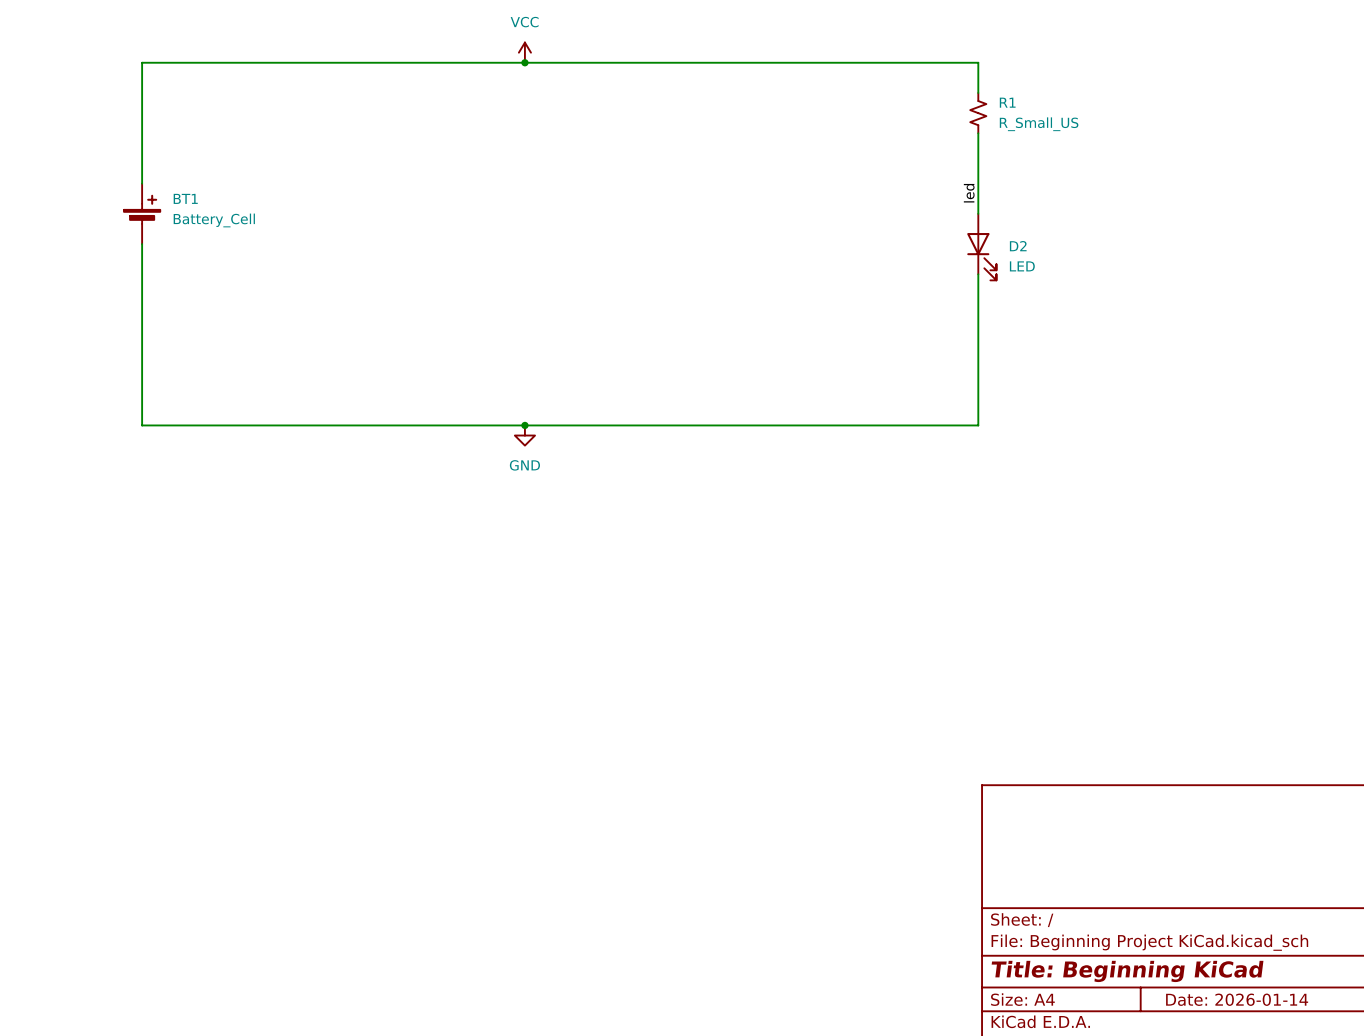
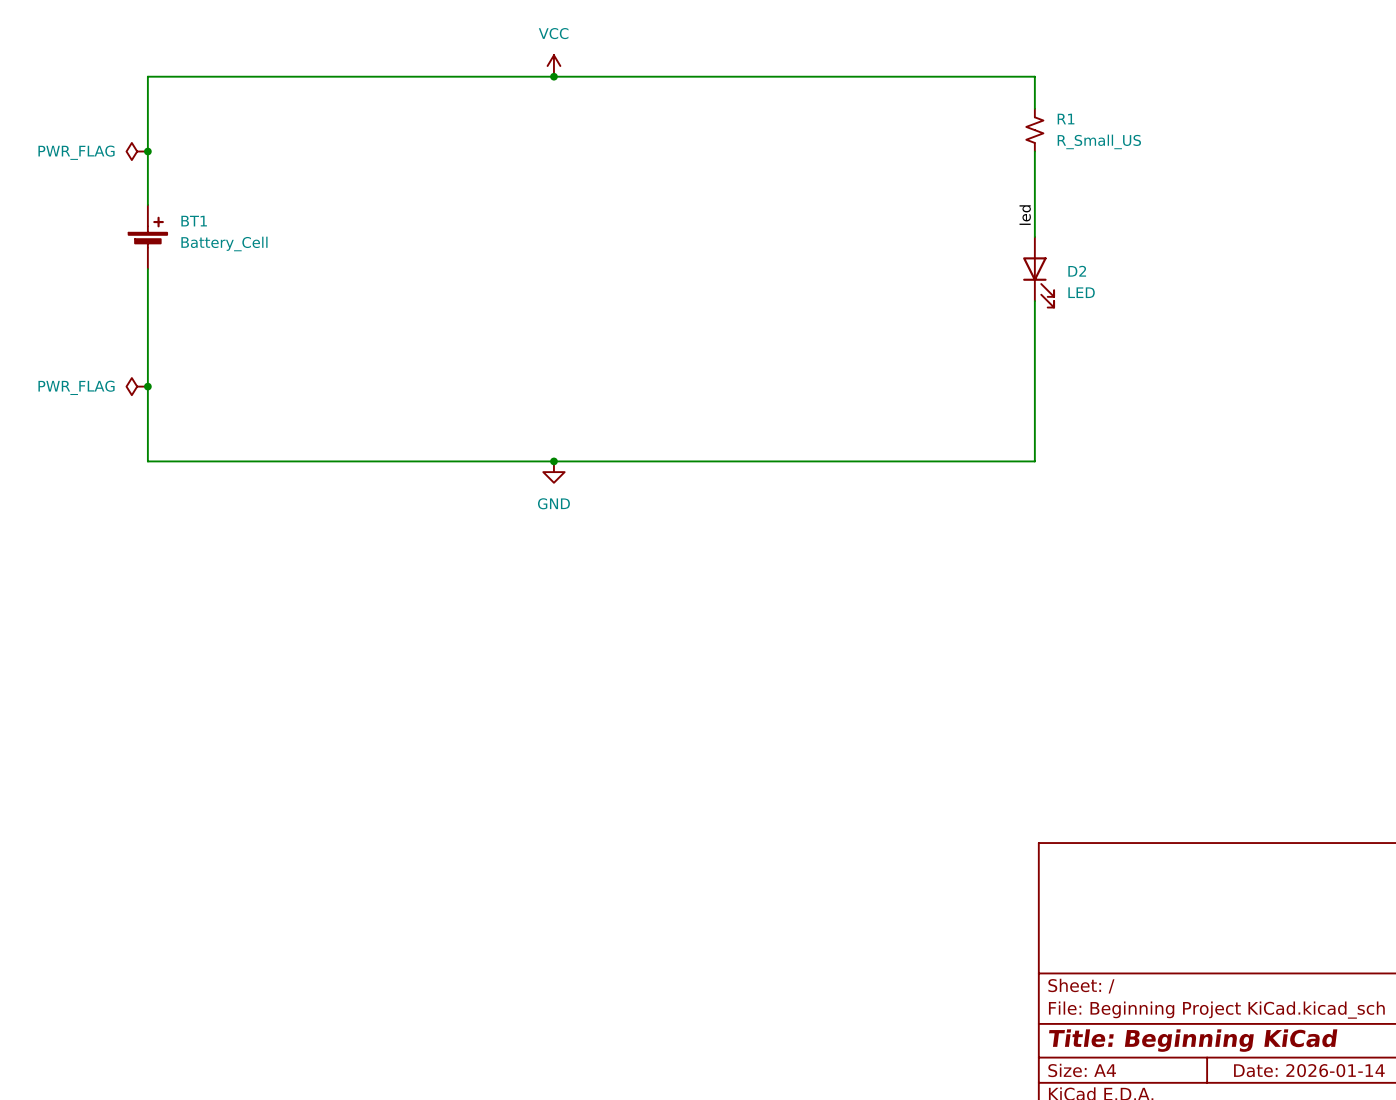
power symbol: none -> PWR_FLAG (137, 151)
junction: none -> (147, 151)
power symbol: none -> PWR_FLAG (137, 386)
junction: none -> (147, 386)

